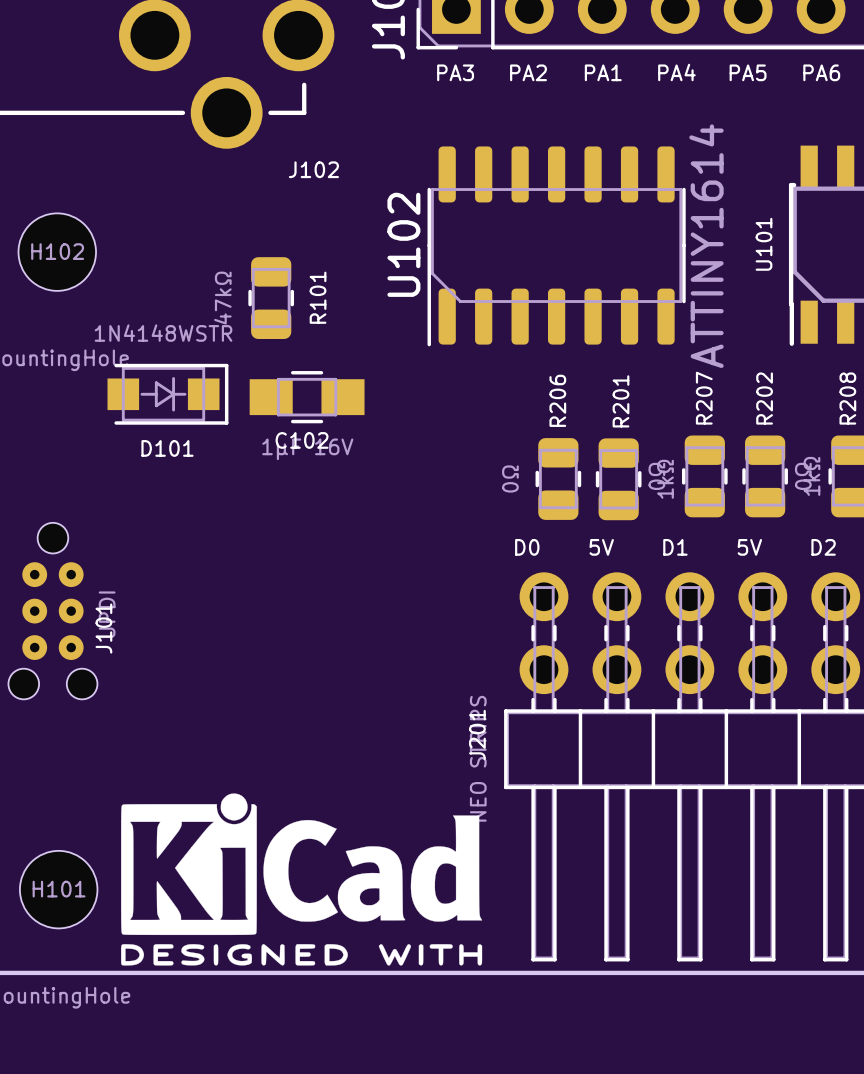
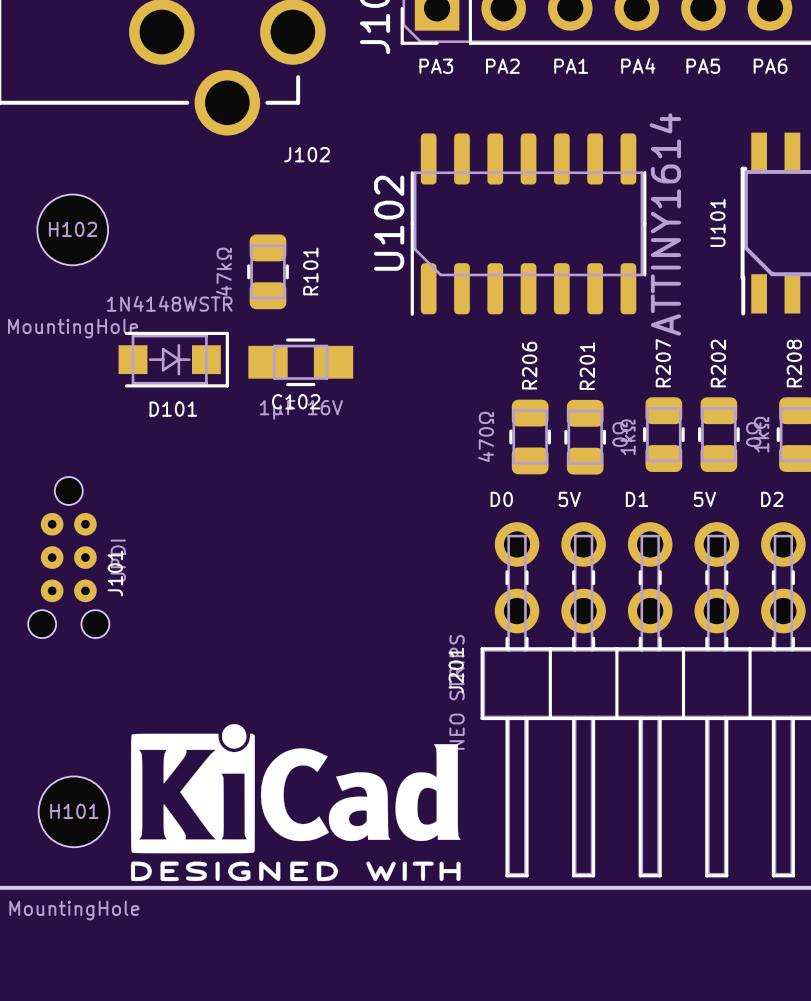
R206 value: 0Ω (510, 478) -> 470Ω (486, 436)

